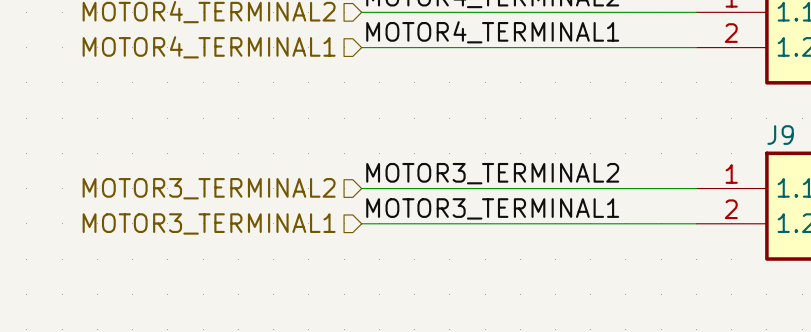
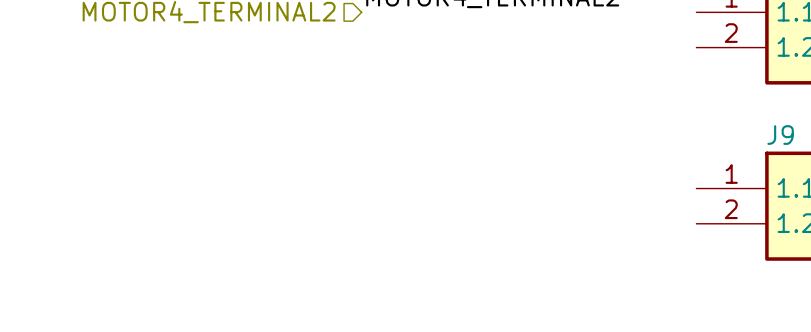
wire: (361, 12) (696, 12) -> none
label: MOTOR4_TERMINAL1 (492, 32) -> none
hierarchical label: MOTOR4_TERMINAL1 (209, 47) -> none
wire: (361, 47) (696, 47) -> none
label: MOTOR3_TERMINAL2 (492, 173) -> none
hierarchical label: MOTOR3_TERMINAL2 (209, 188) -> none
wire: (361, 188) (696, 188) -> none
label: MOTOR3_TERMINAL1 (492, 208) -> none
hierarchical label: MOTOR3_TERMINAL1 (209, 223) -> none
wire: (361, 223) (696, 223) -> none

